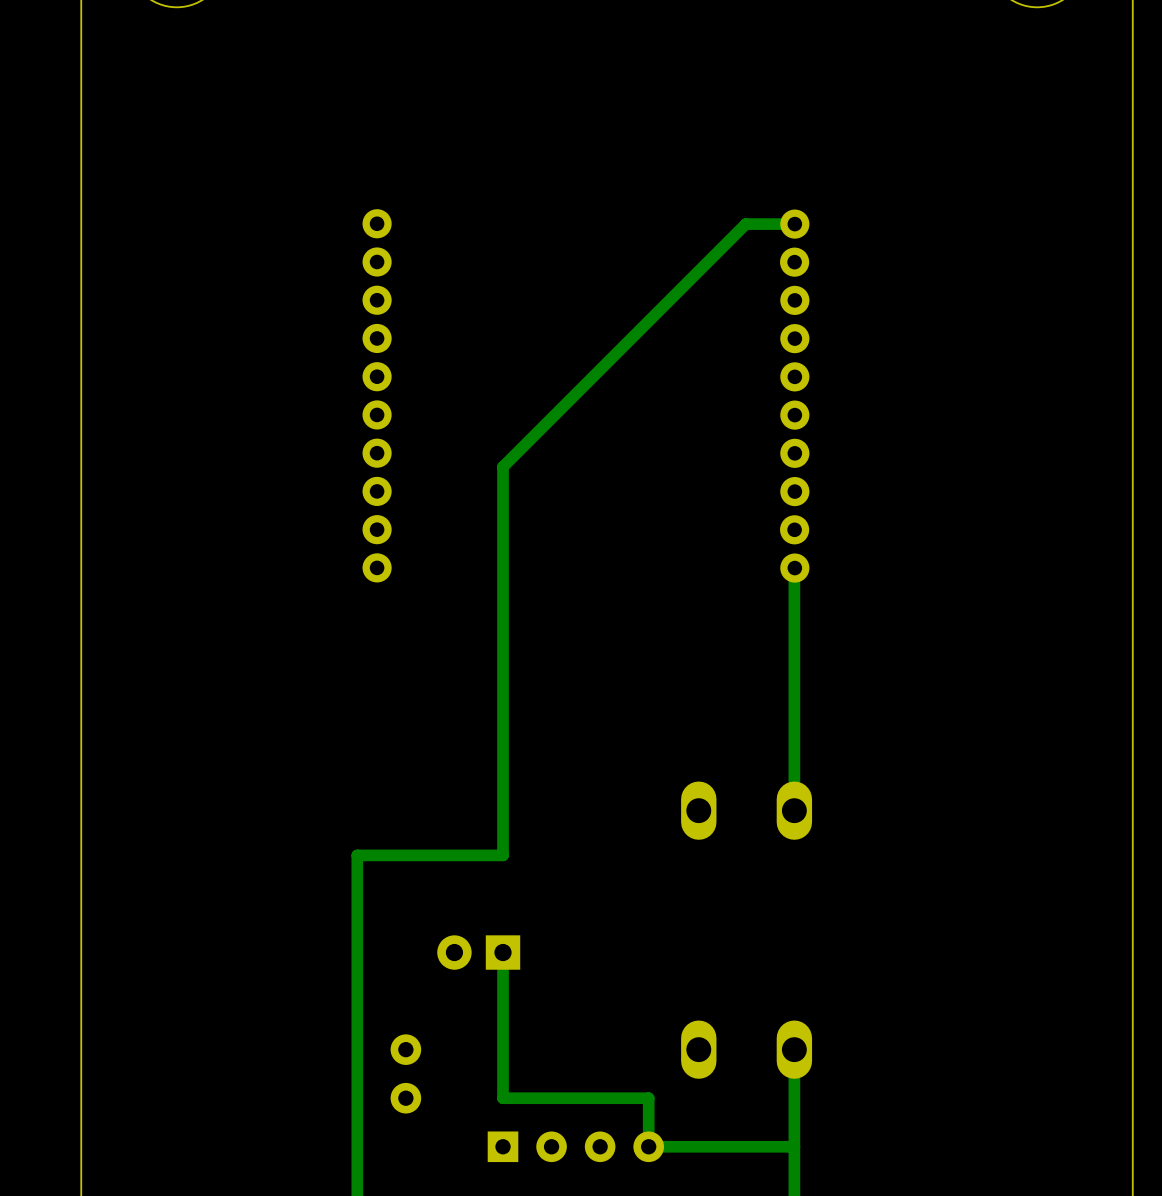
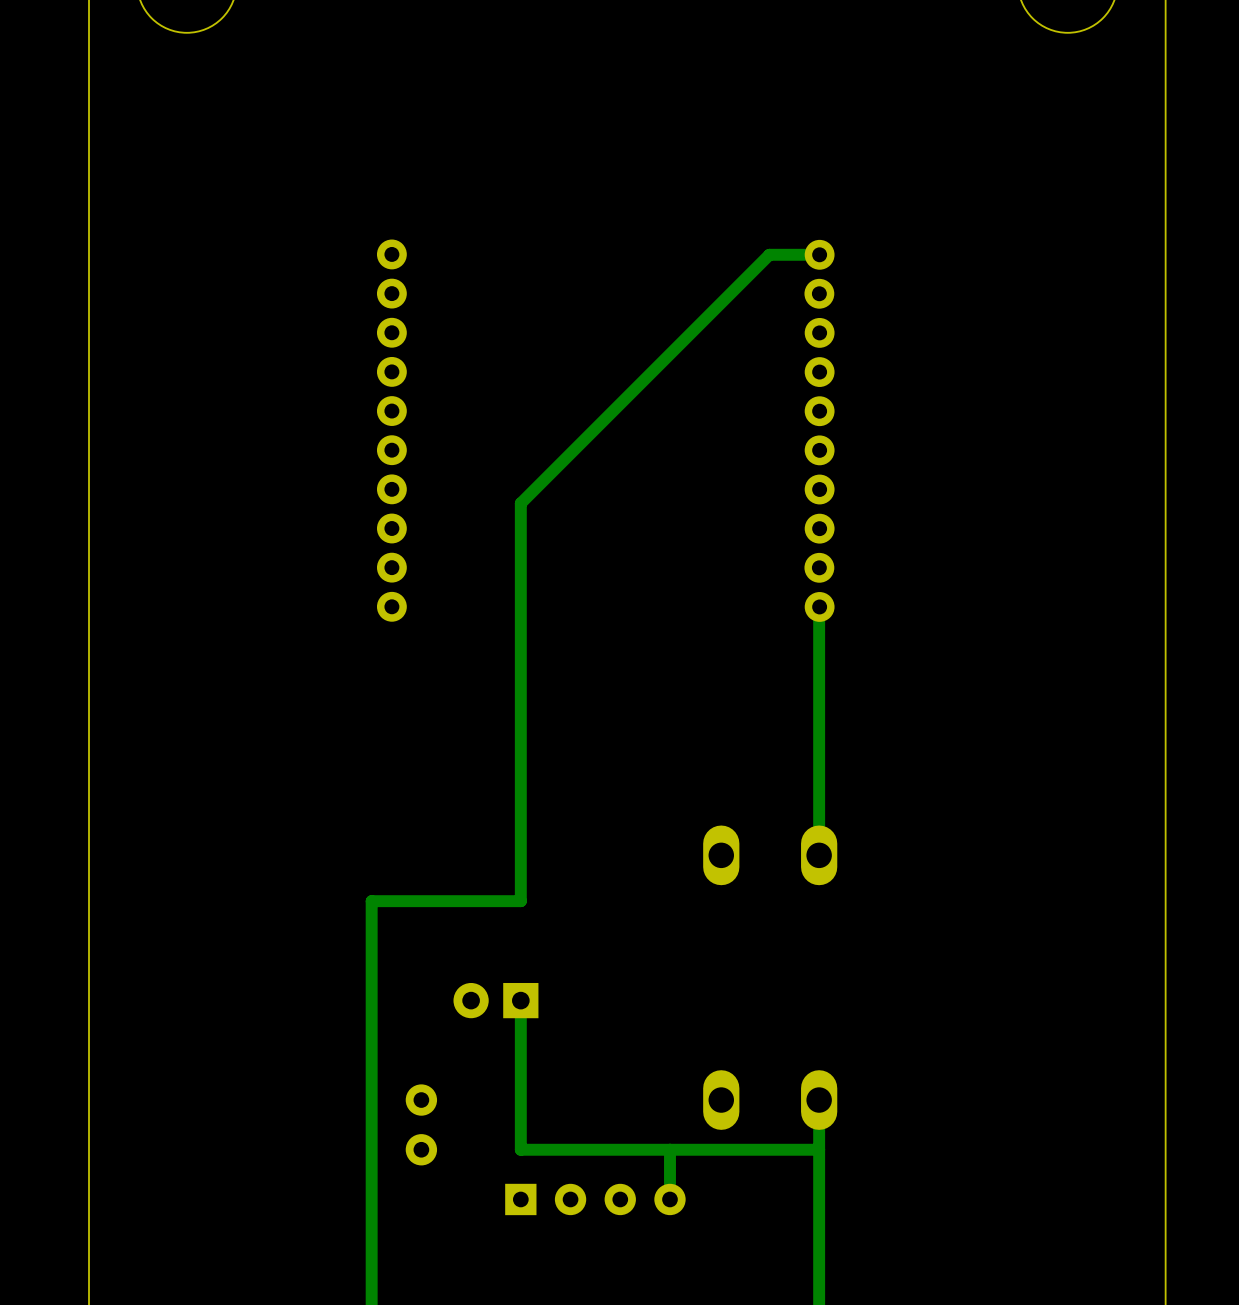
track: (794, 1146) (648, 1146) -> (819, 1149) (669, 1149)

